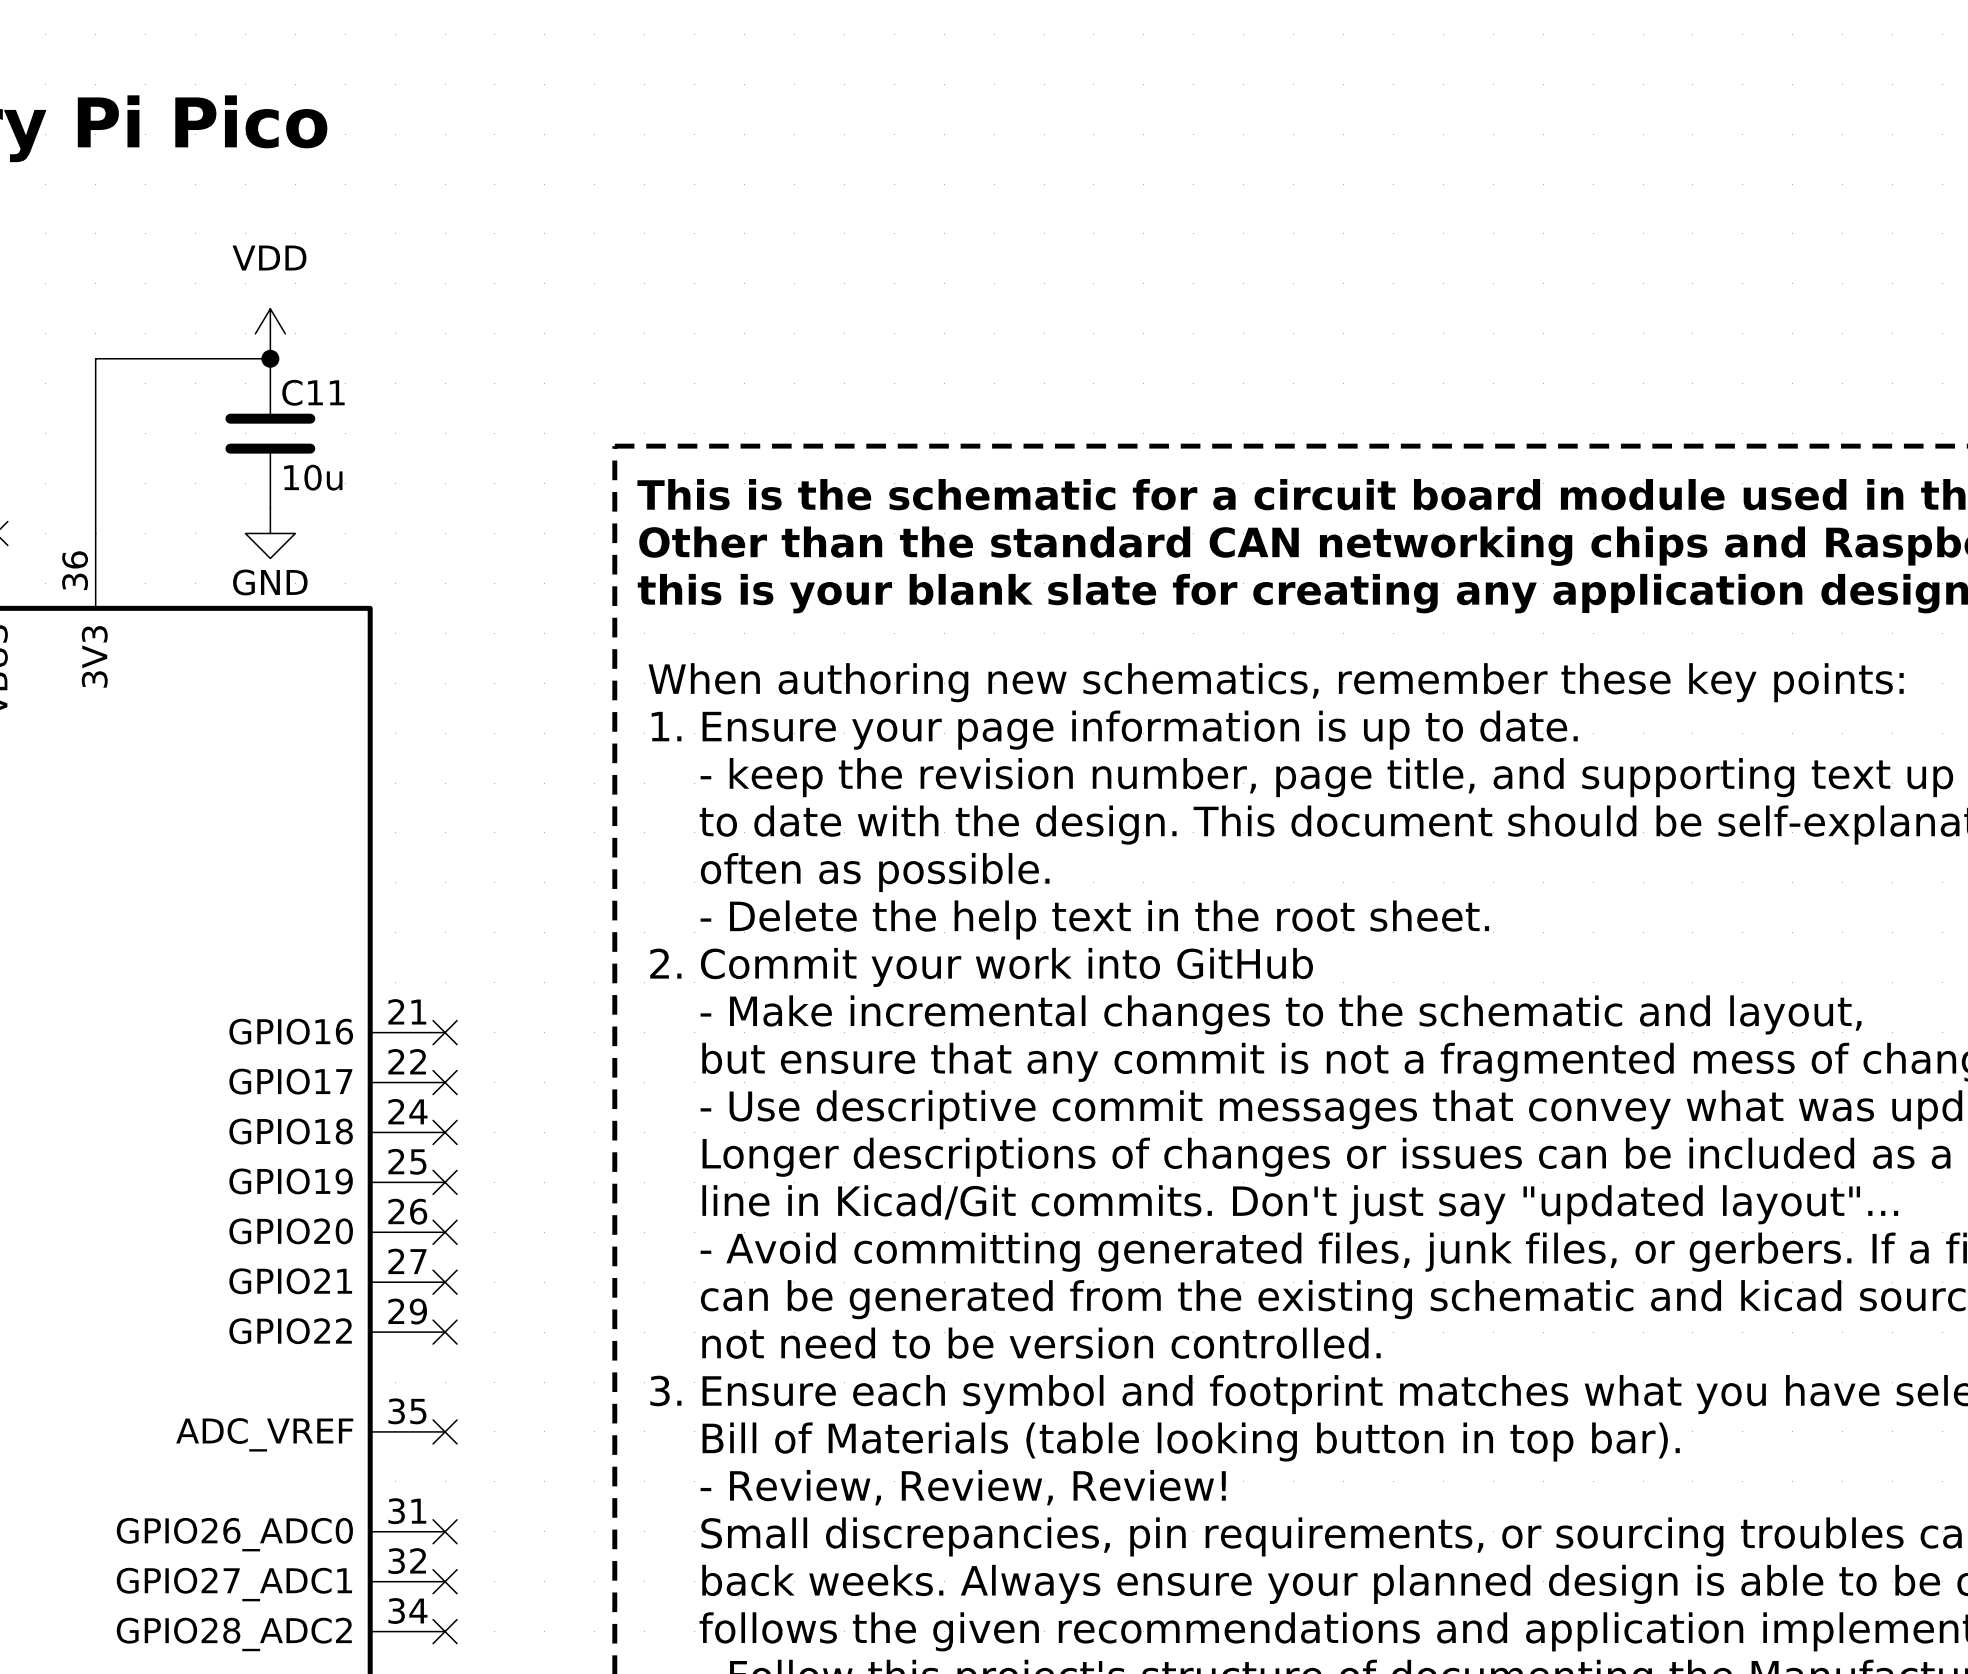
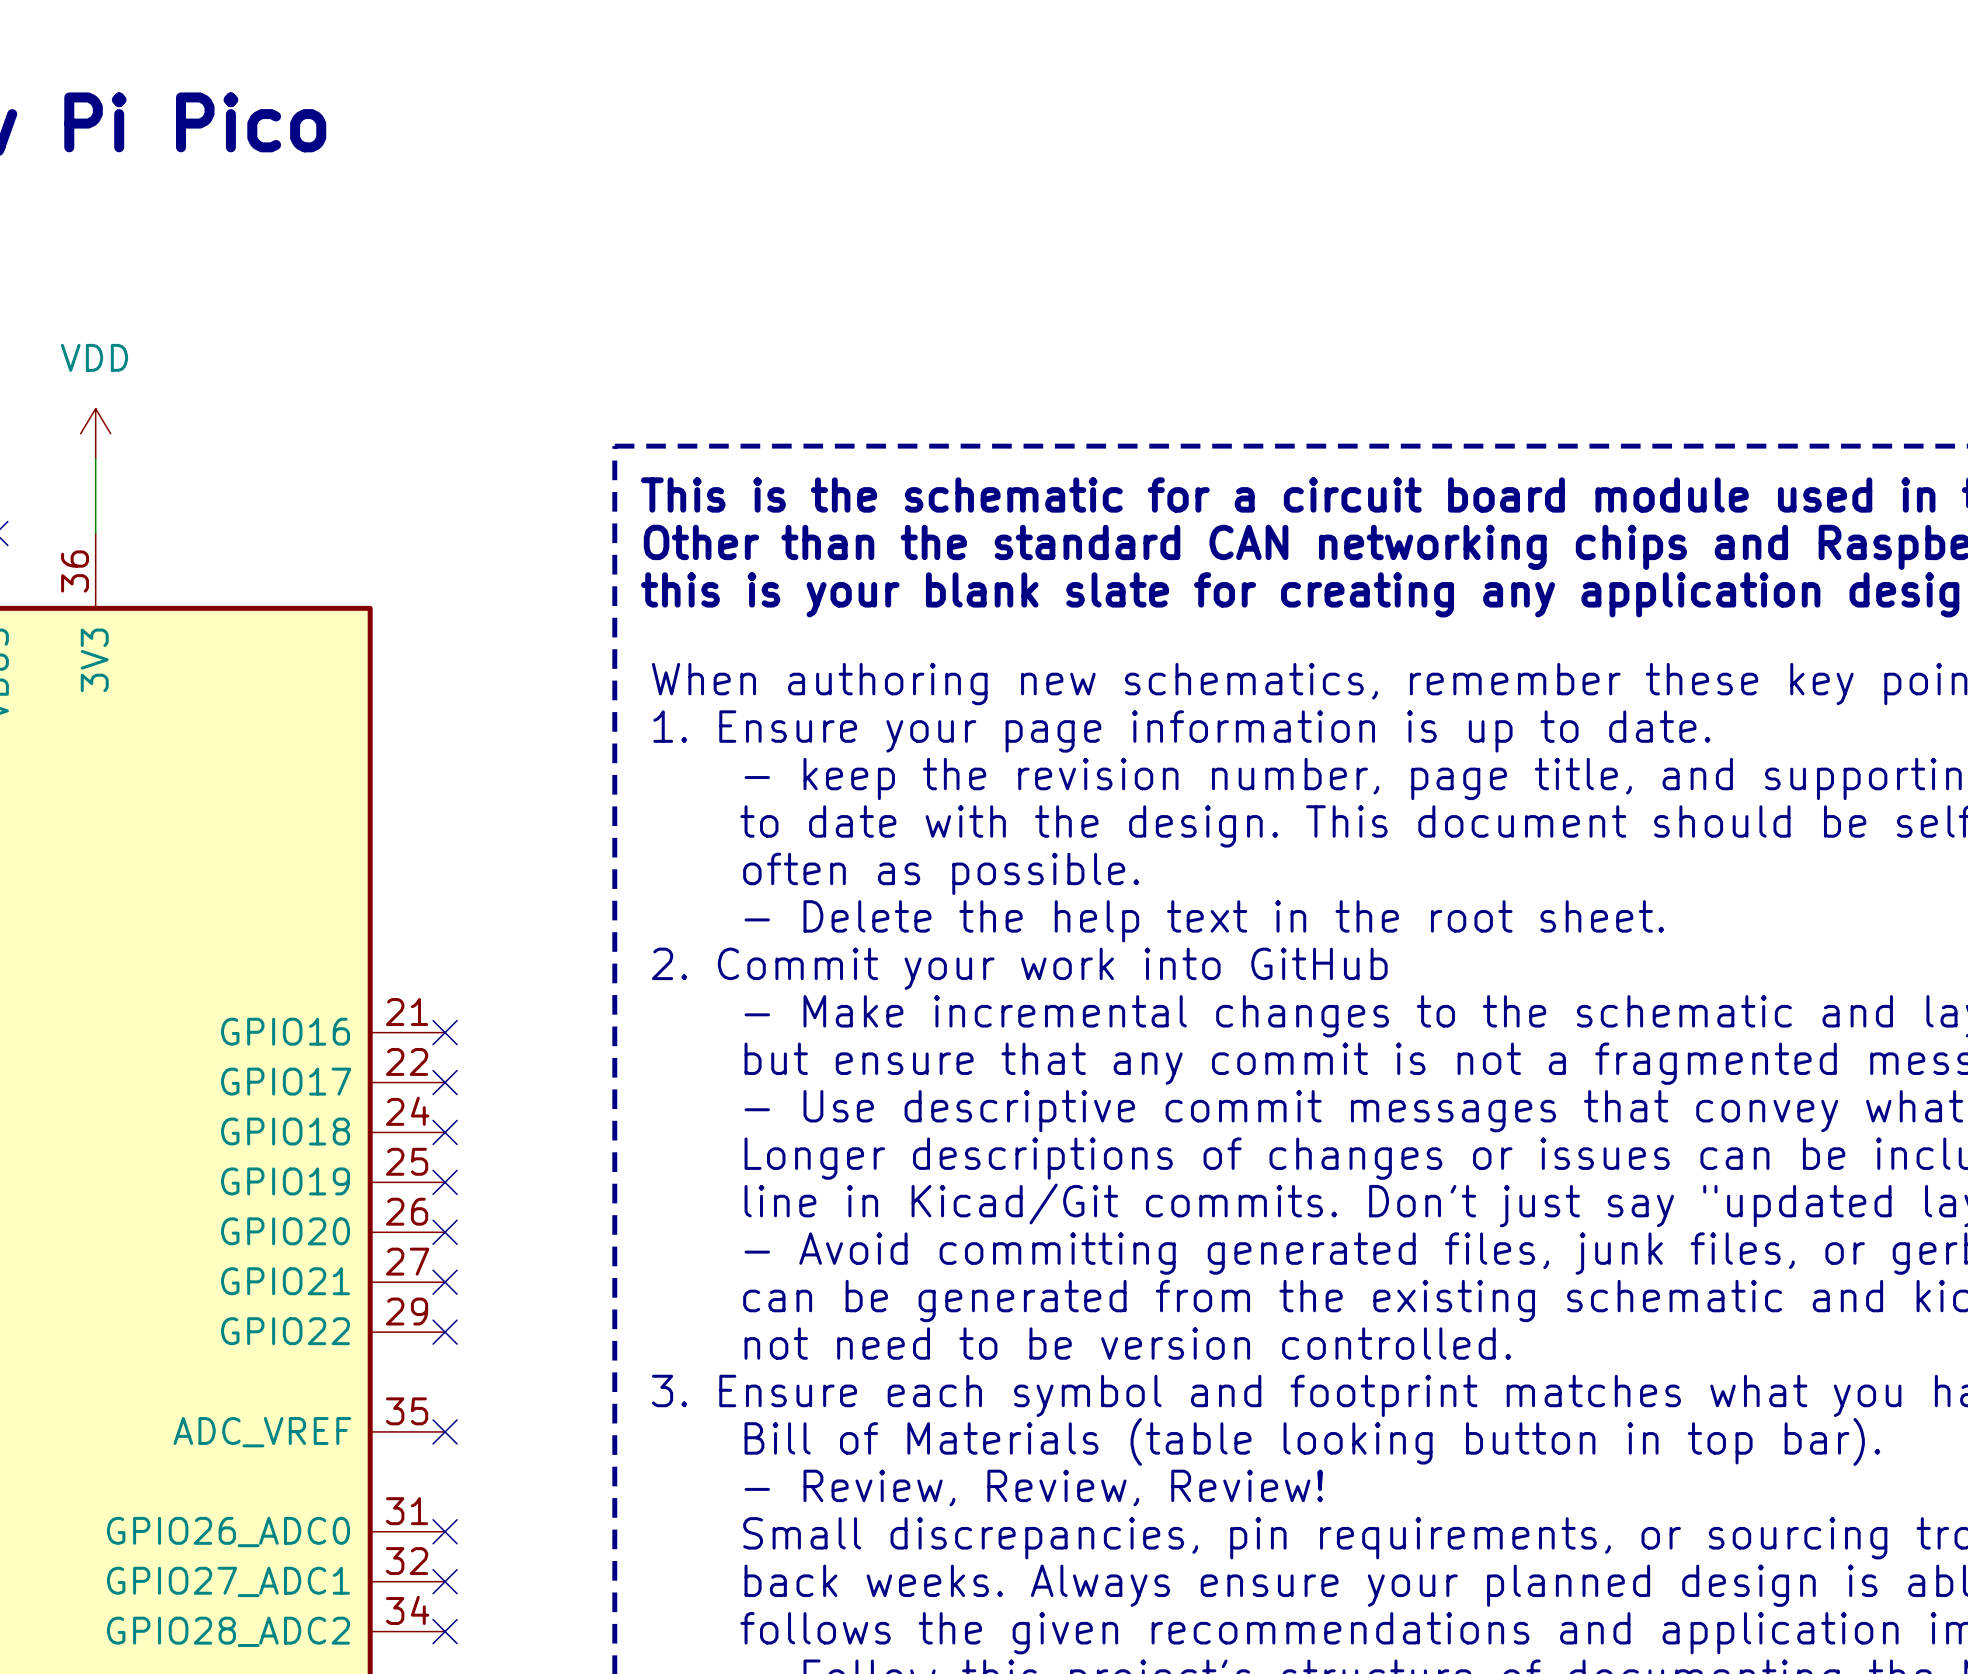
power symbol position: VDD (270, 333) -> VDD (95, 433)
wire: (270, 358) (95, 358) (95, 458) -> none
junction: (270, 358) -> none
C11: 10u (270, 433) -> none
power symbol: GND (270, 533) -> none

